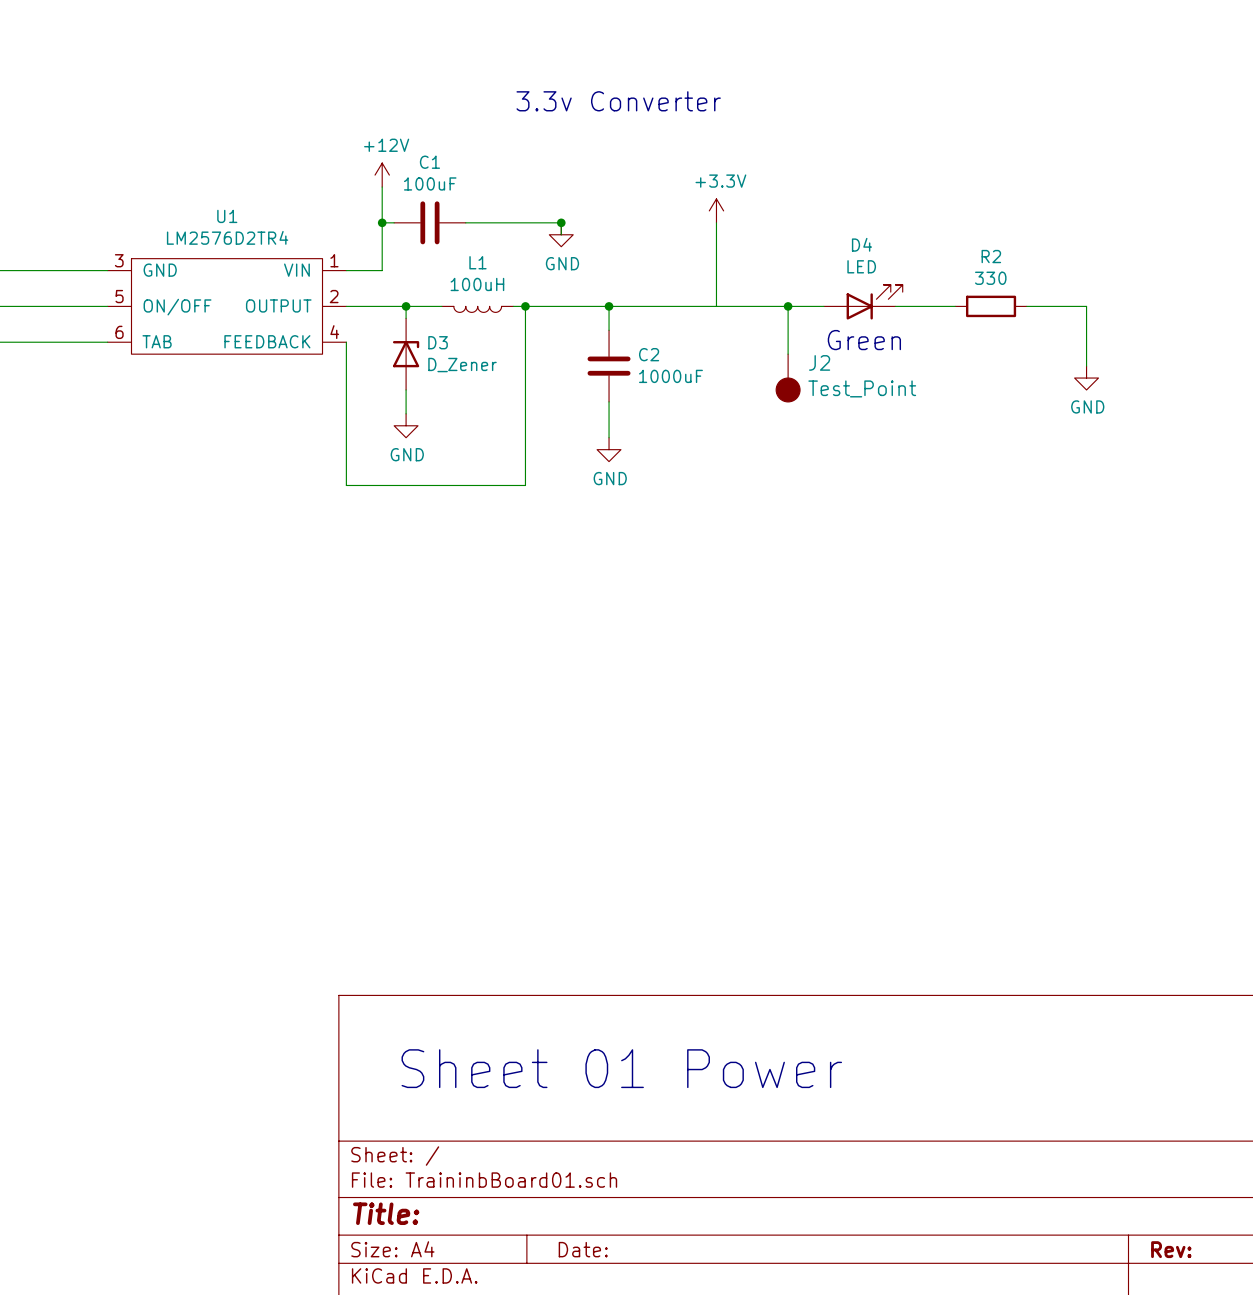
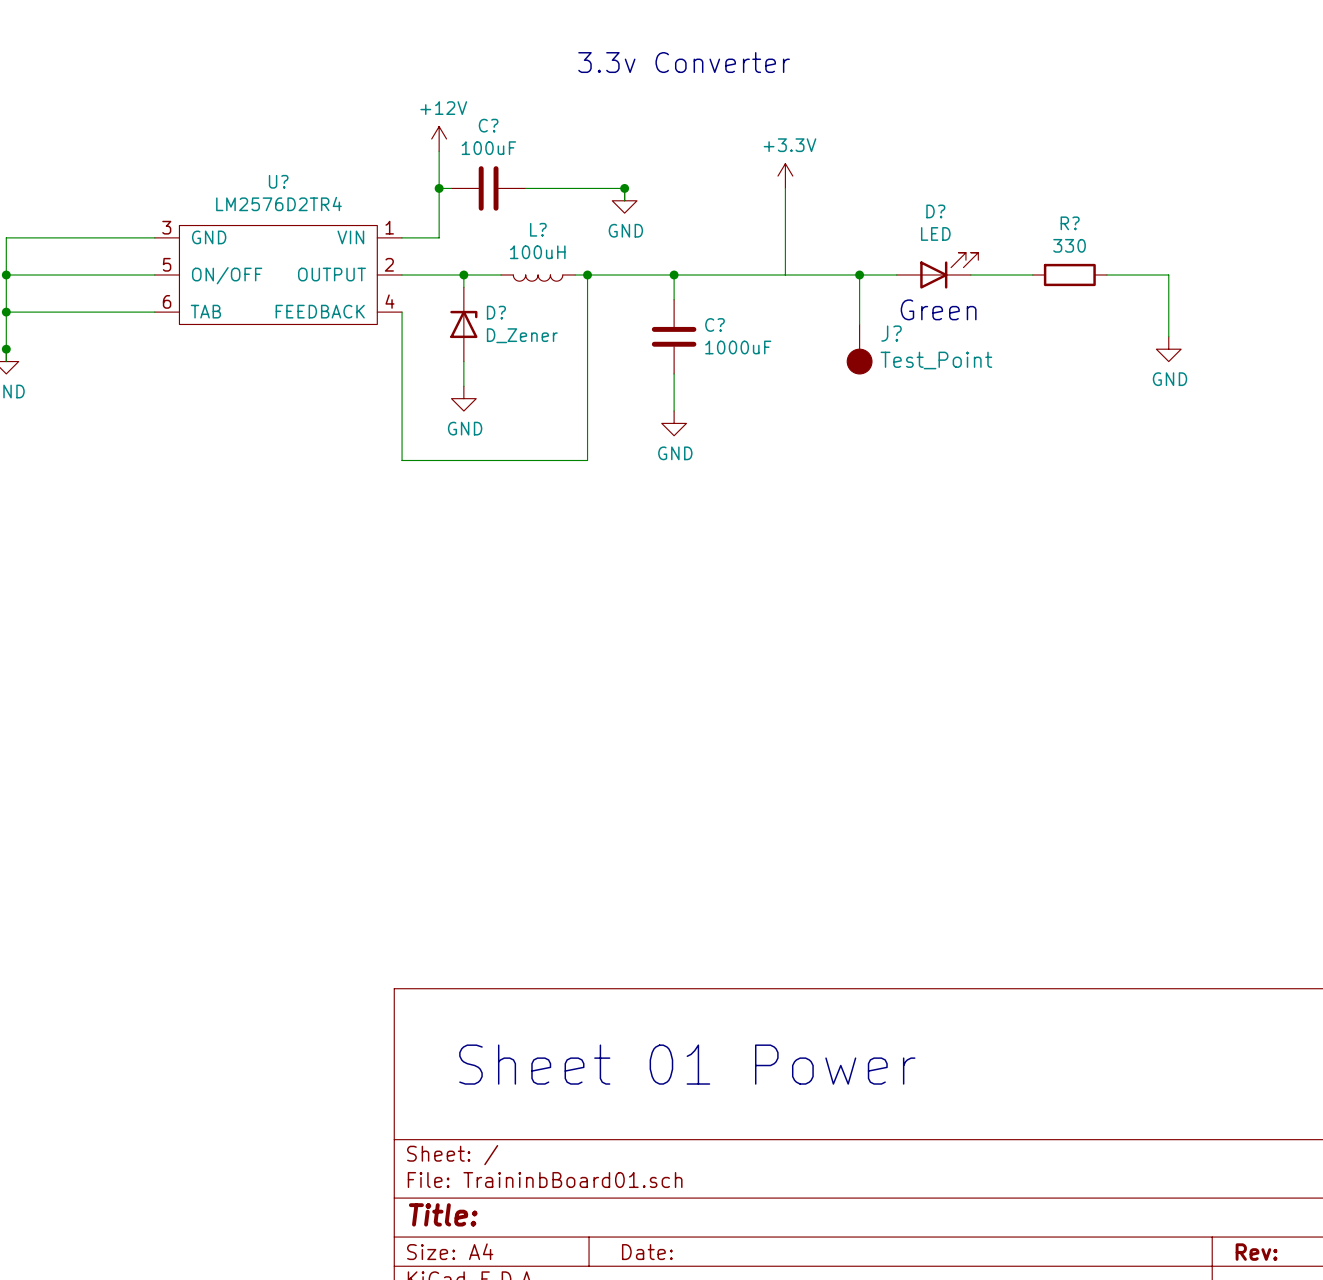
C1 name: C1 (429, 162) -> C? (488, 125)
U1 name: U1 (227, 216) -> U? (278, 181)
D4 name: D4 (861, 244) -> D? (935, 211)
R2 name: R2 (991, 256) -> R? (1070, 223)
L1 name: L1 (477, 262) -> L? (538, 229)
D3 name: D3 (438, 342) -> D? (496, 312)
C2 name: C2 (649, 354) -> C? (715, 324)
J2 name: J2 (819, 362) -> J? (891, 333)

